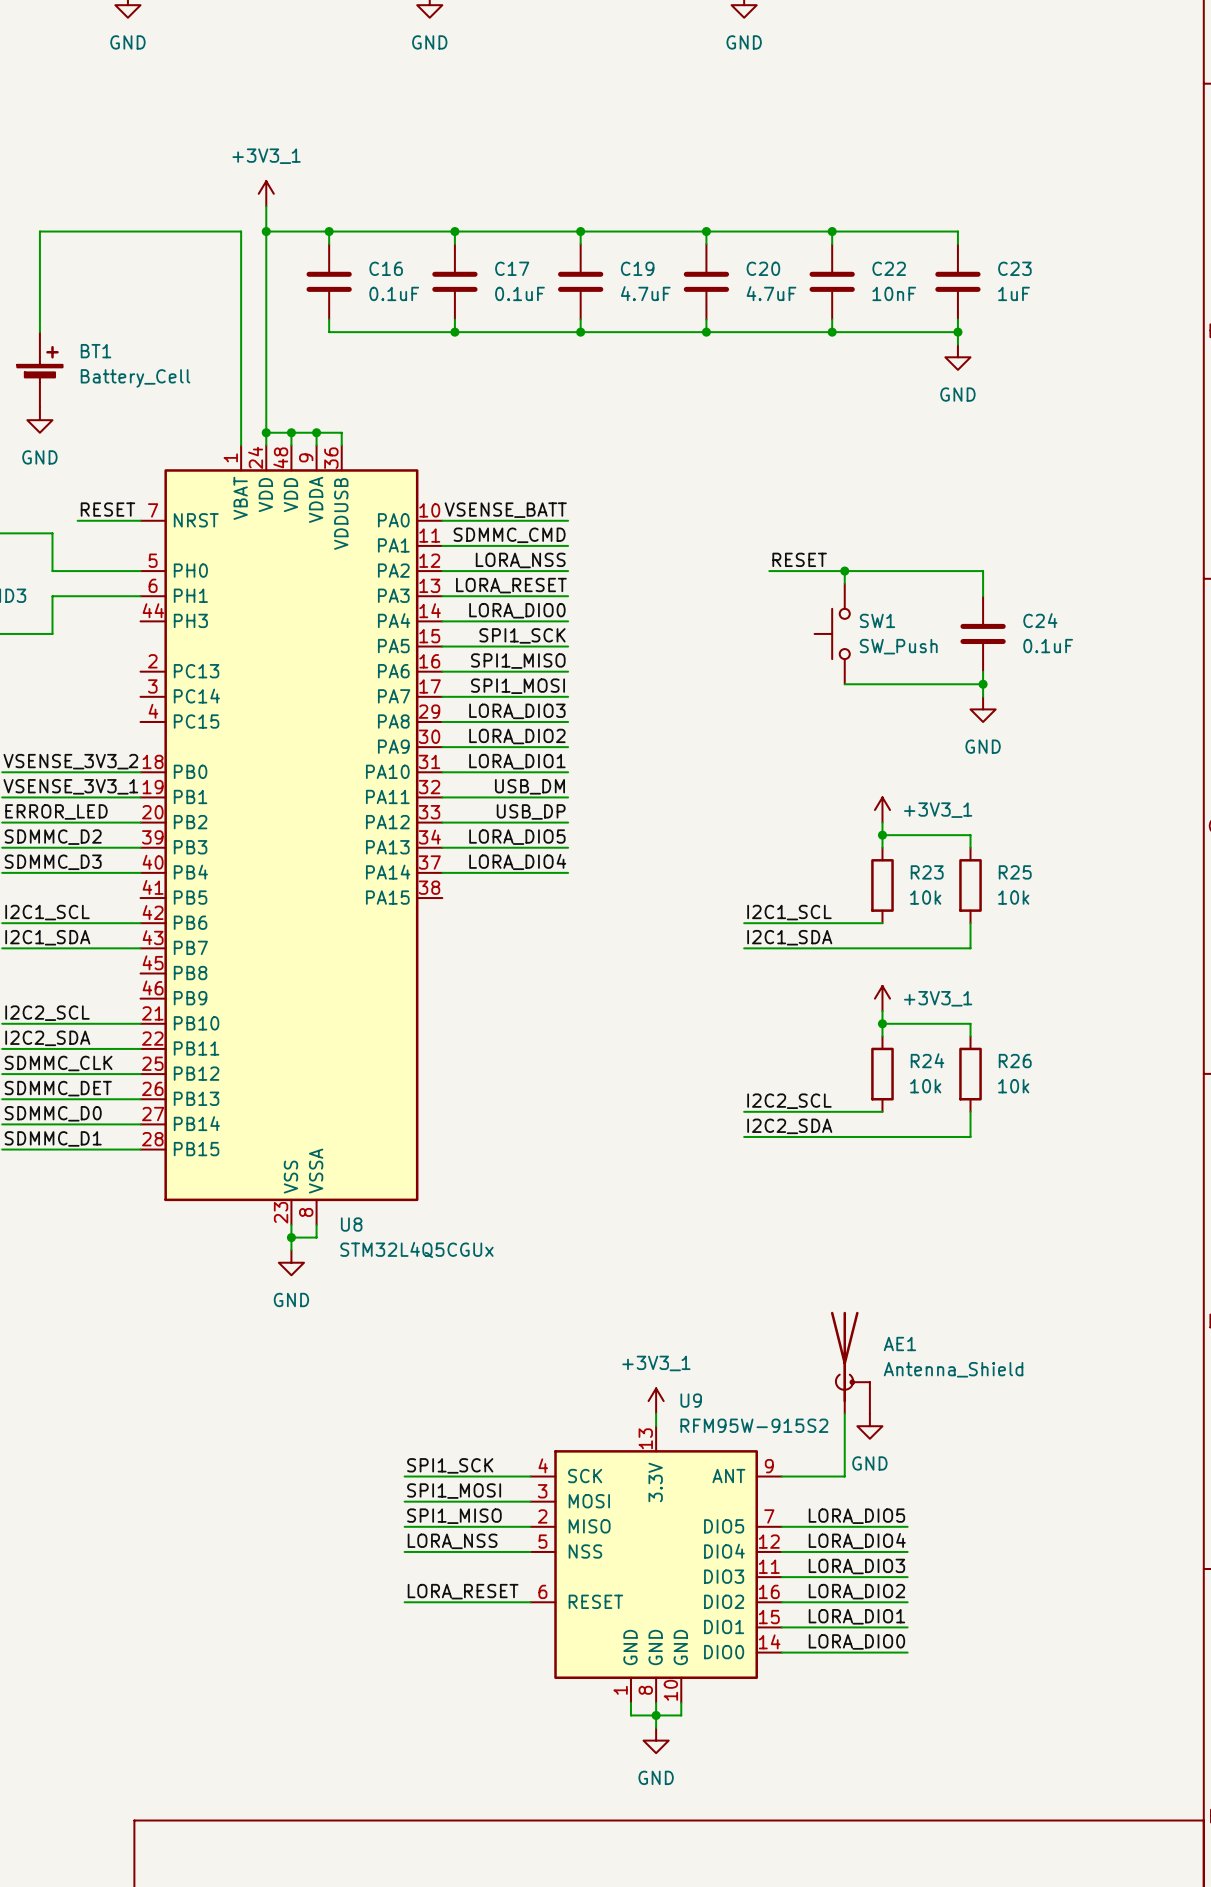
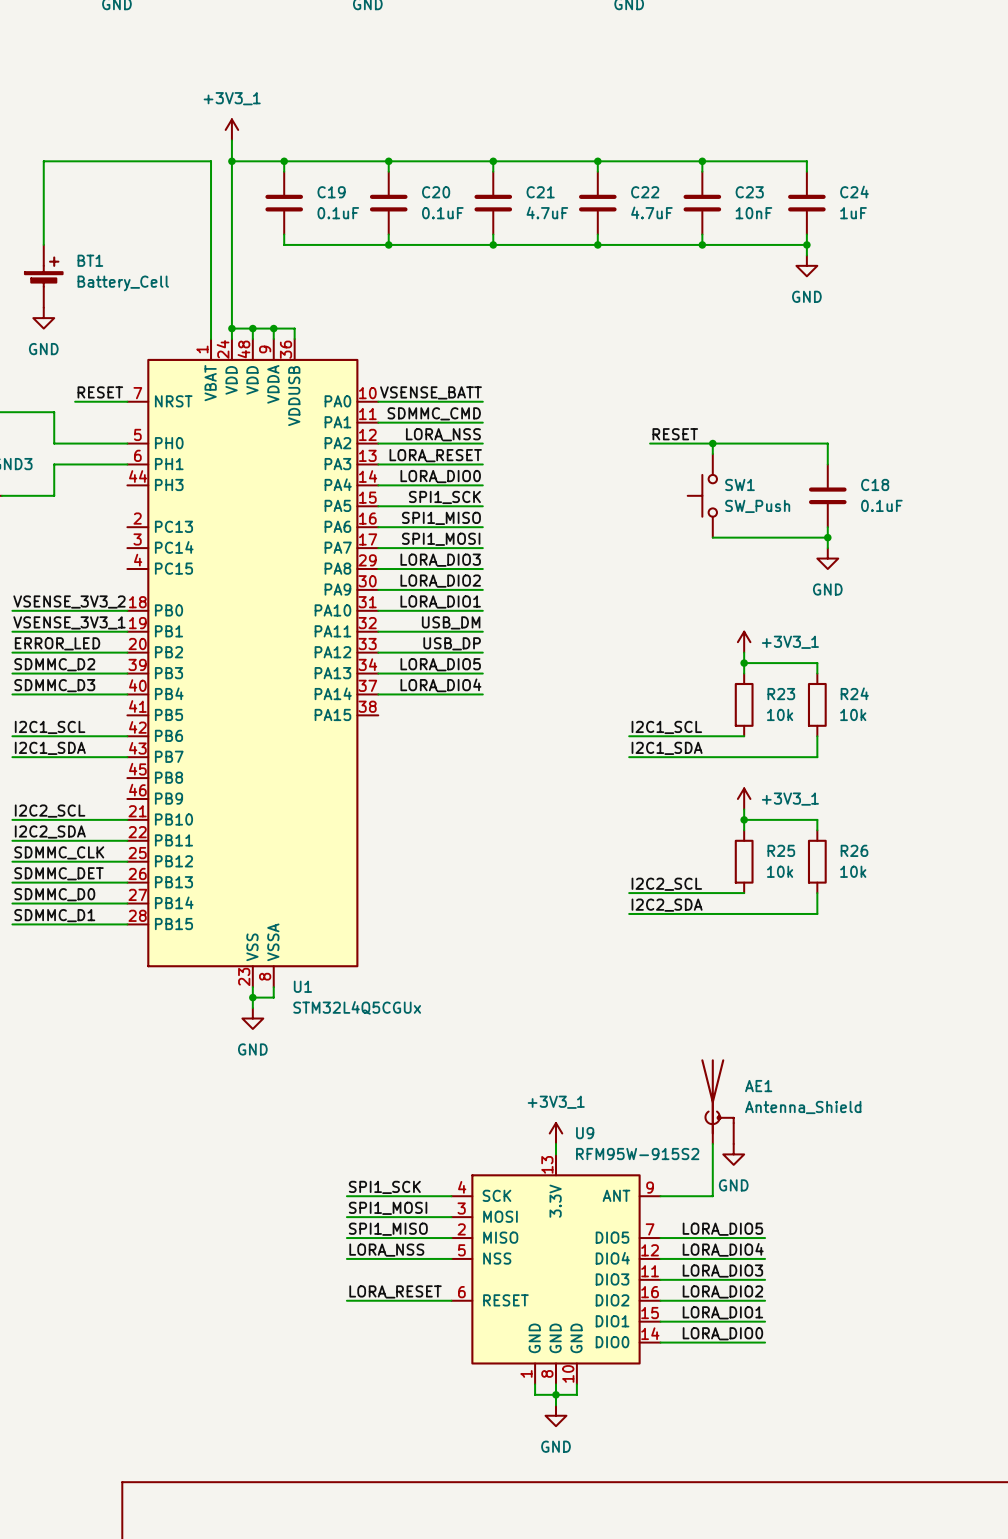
C16 name: C16 (386, 268) -> C19 (331, 192)
C17 name: C17 (512, 268) -> C20 (436, 192)
C19 name: C19 (637, 268) -> C21 (540, 192)
C20 name: C20 (763, 268) -> C22 (645, 192)
C22 name: C22 (889, 268) -> C23 (749, 192)
C23 name: C23 (1014, 268) -> C24 (854, 192)
C24 name: C24 (1040, 620) -> C18 (875, 484)
R25 name: R25 (1015, 872) -> R24 (854, 693)
R24 name: R24 (927, 1060) -> R25 (781, 850)
U8 name: U8 (351, 1224) -> U1 (302, 986)

